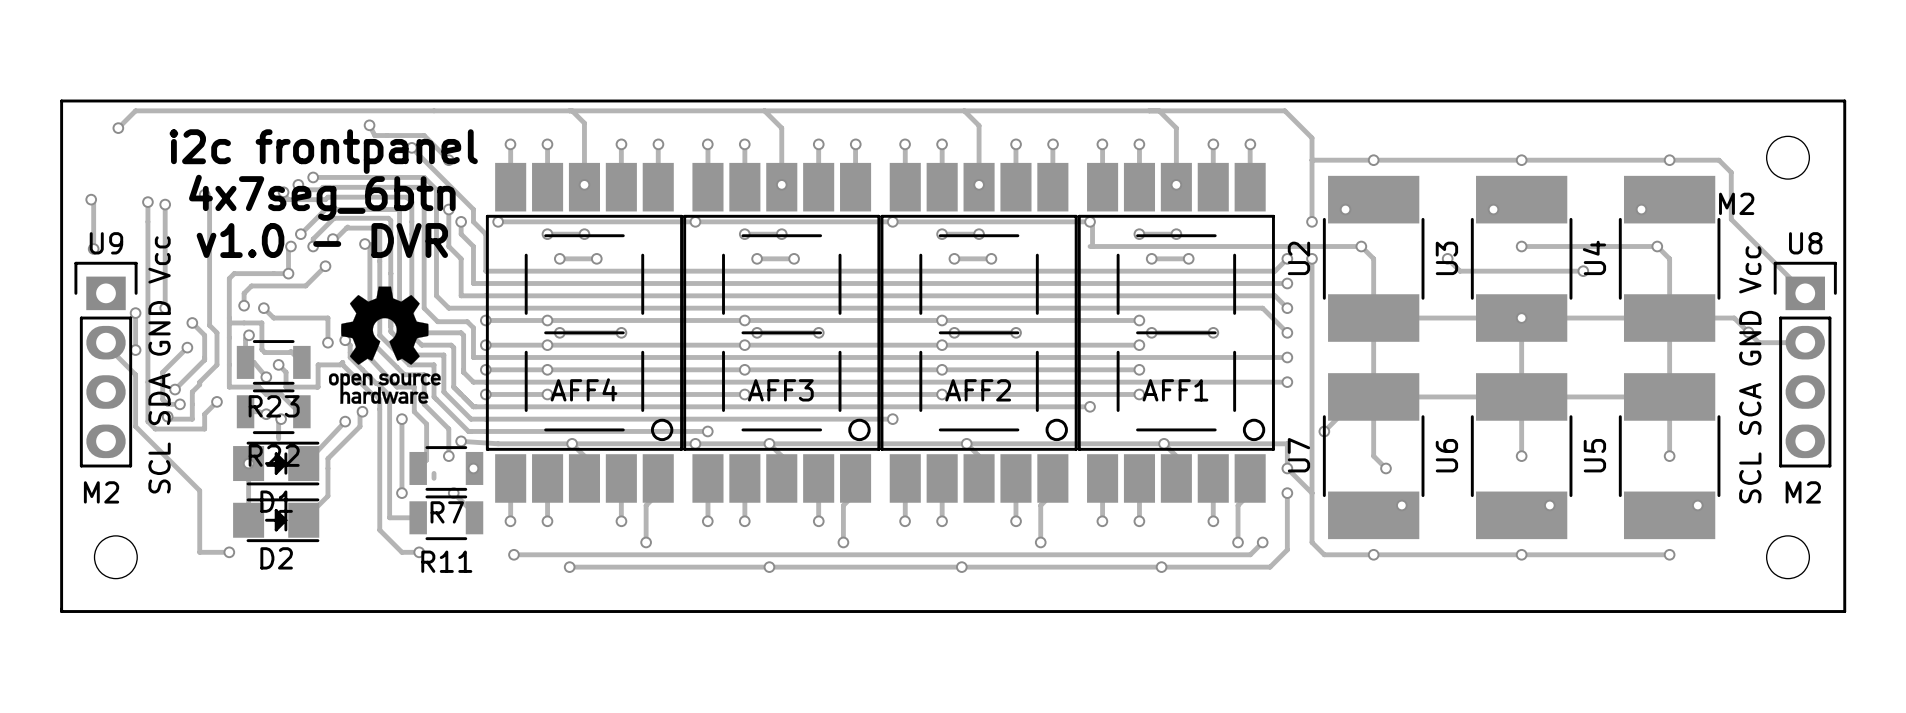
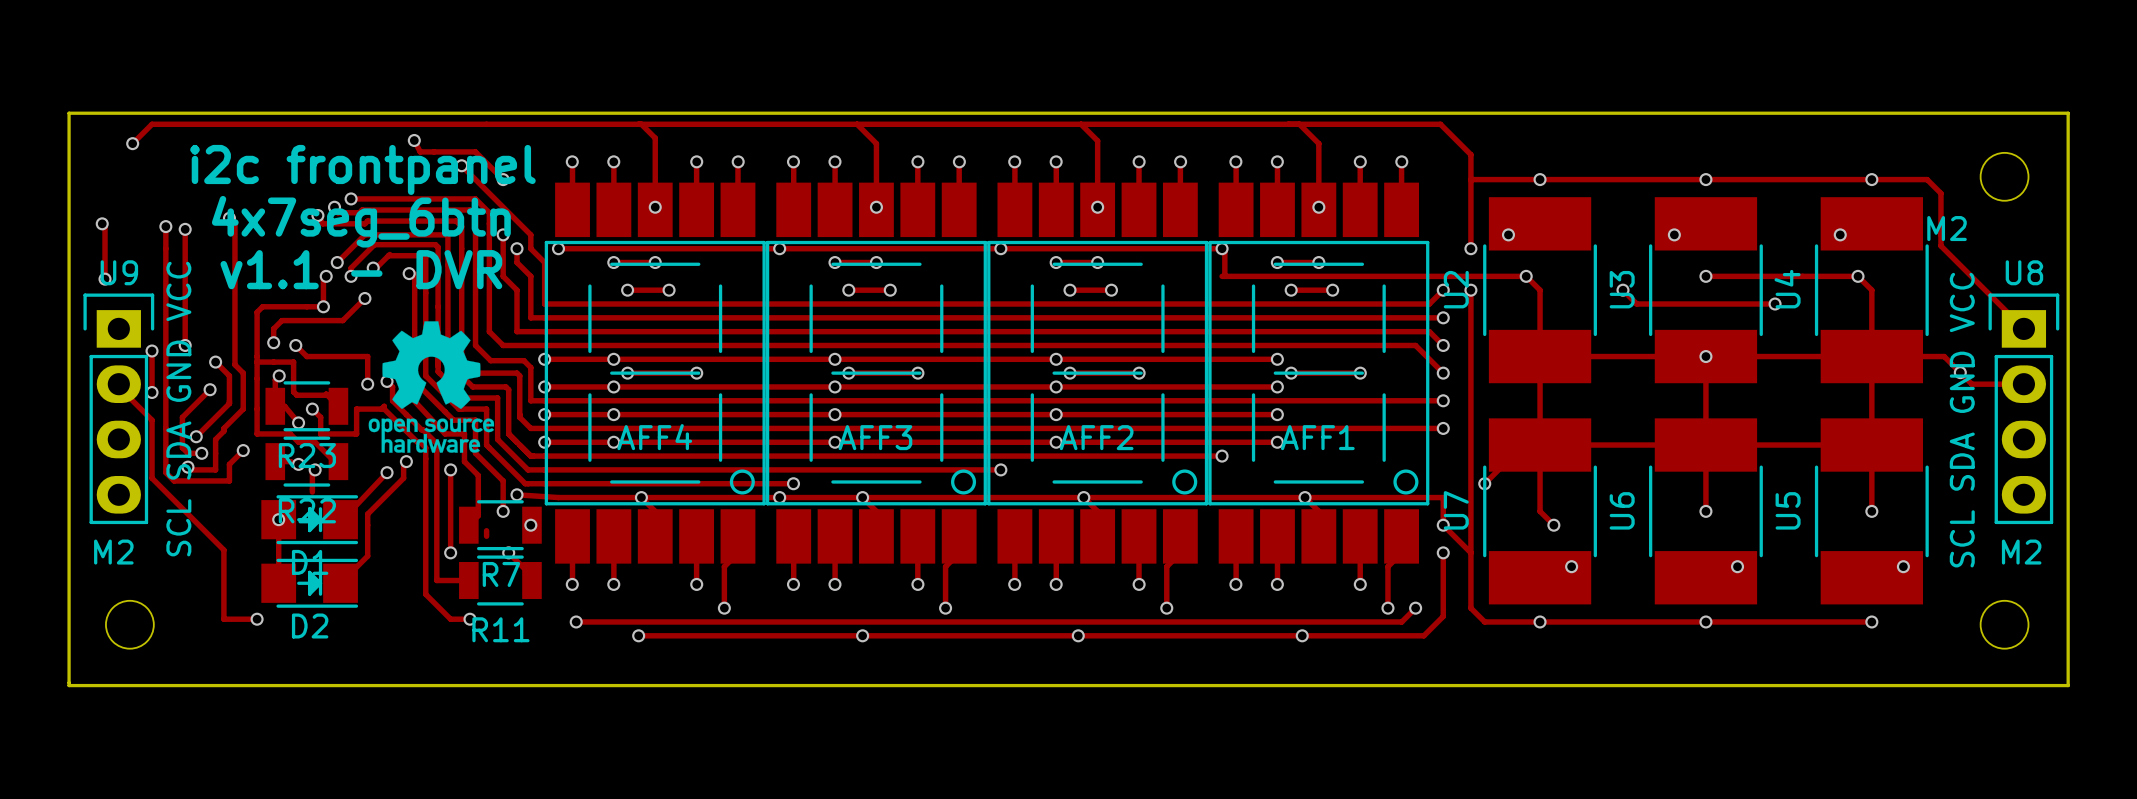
text: v1.0 - DVR (322, 240) -> v1.1 - DVR (361, 269)
U9 value: SCL SDA GND Vcc (159, 364) -> SCL SDA GND VCC (178, 409)
U8 value: SCL SCA GND Vcc (1750, 374) -> SCL SDA GND VCC (1962, 420)

